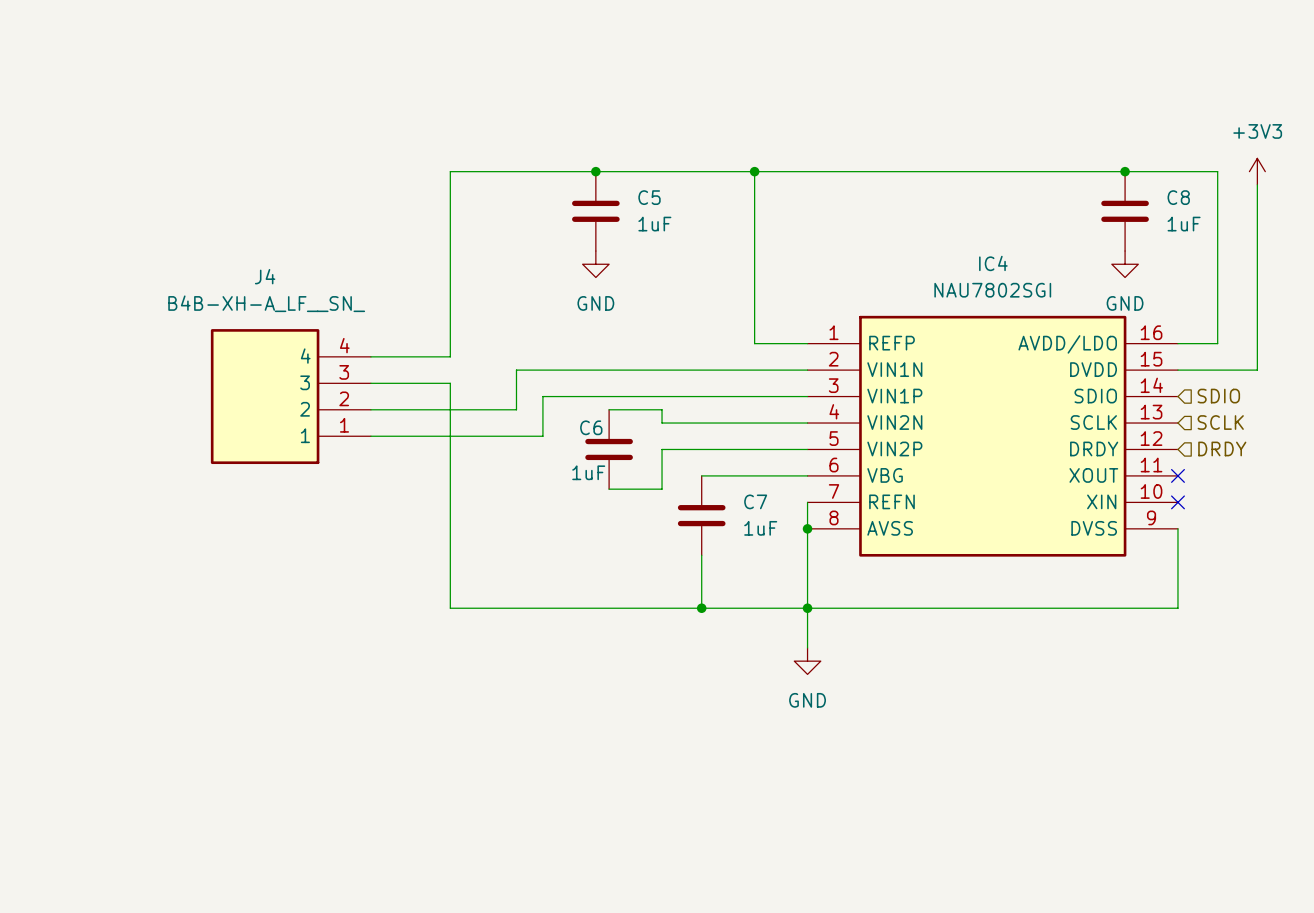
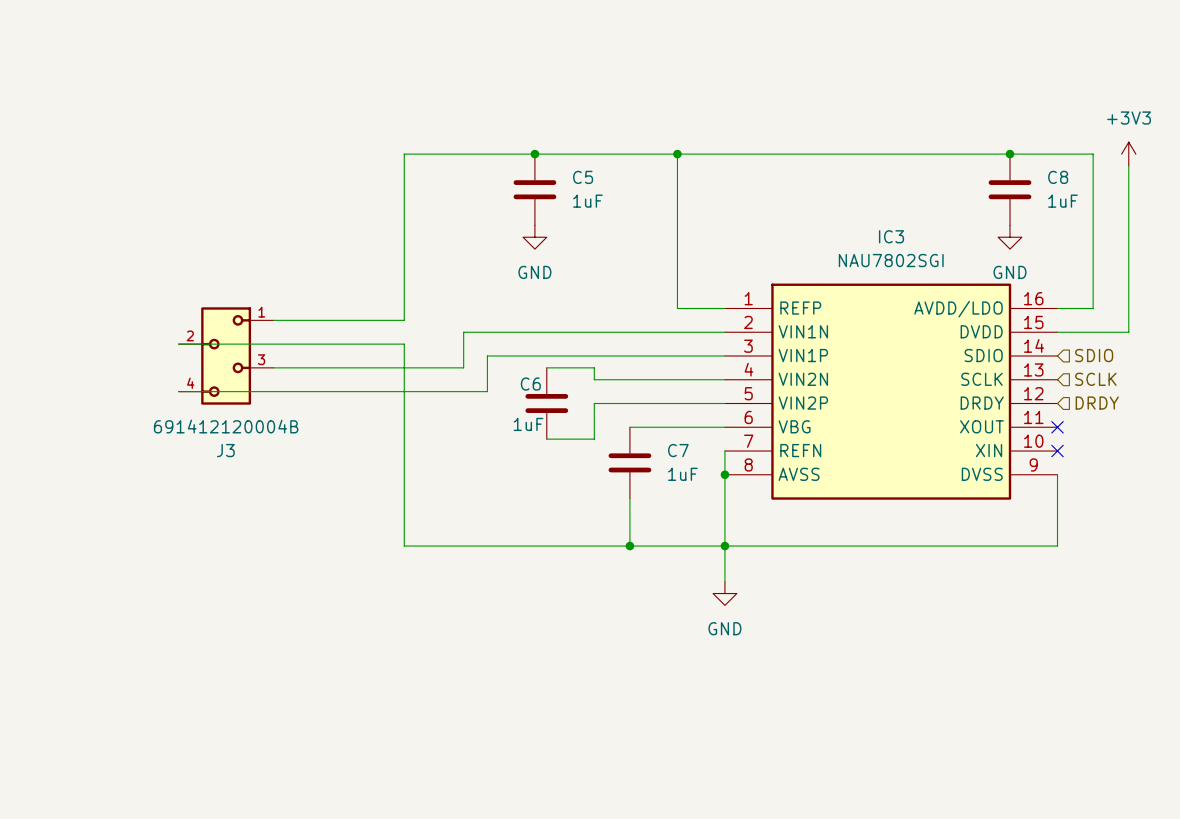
IC4 name: IC4 (993, 263) -> IC3 (891, 236)
J3: none -> 691412120004B (226, 355)
J4: B4B-XH-A_LF__SN_ (290, 396) -> none

